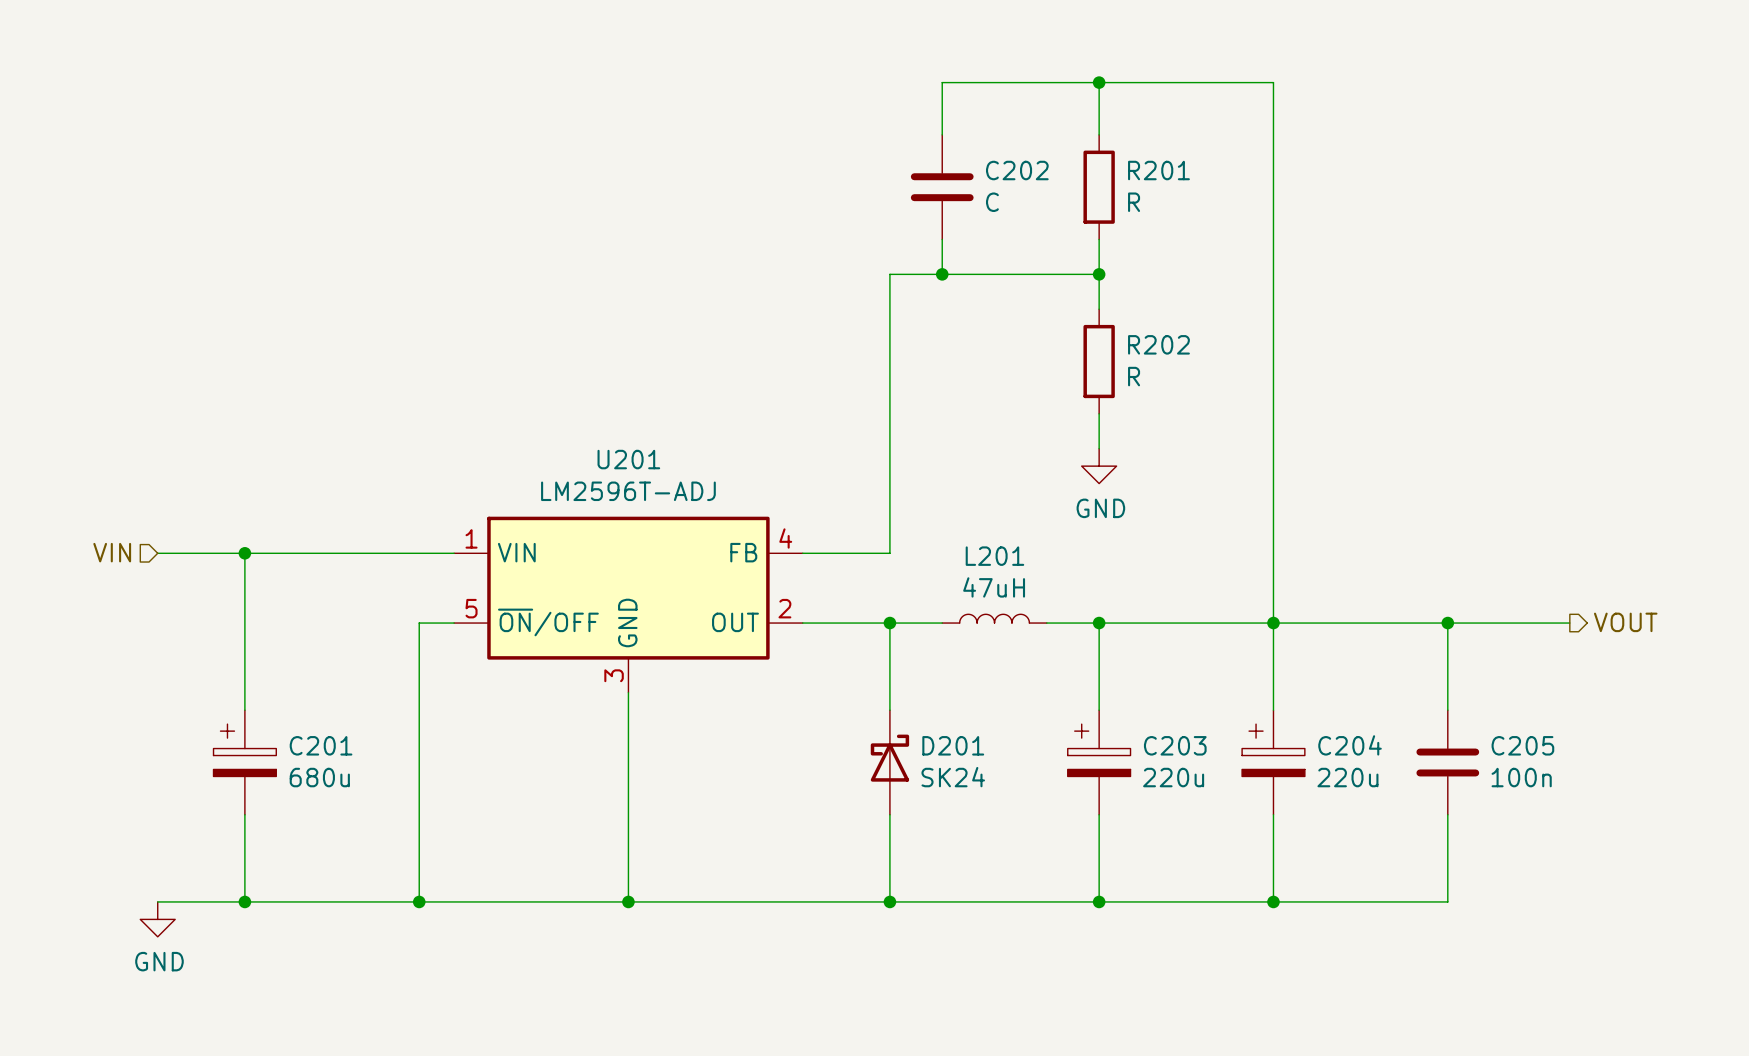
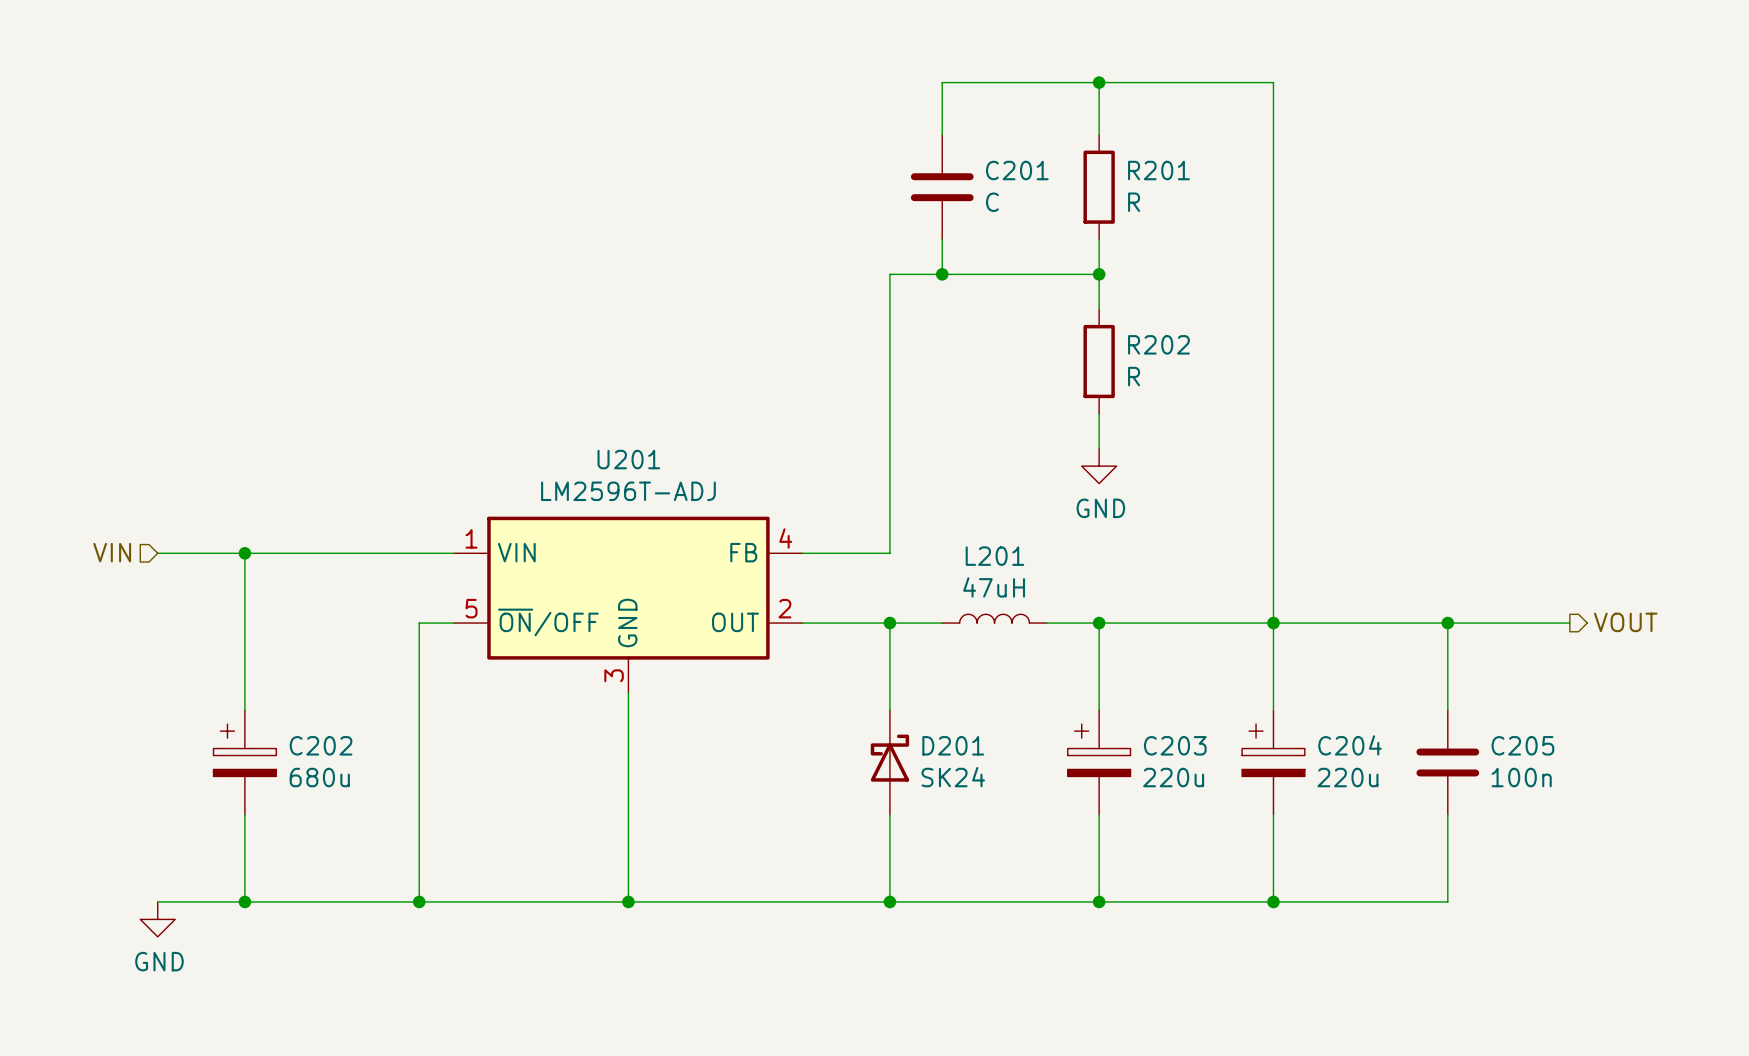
C202 name: C202 (1017, 170) -> C201 (1017, 170)
C201 name: C201 (321, 745) -> C202 (321, 745)

